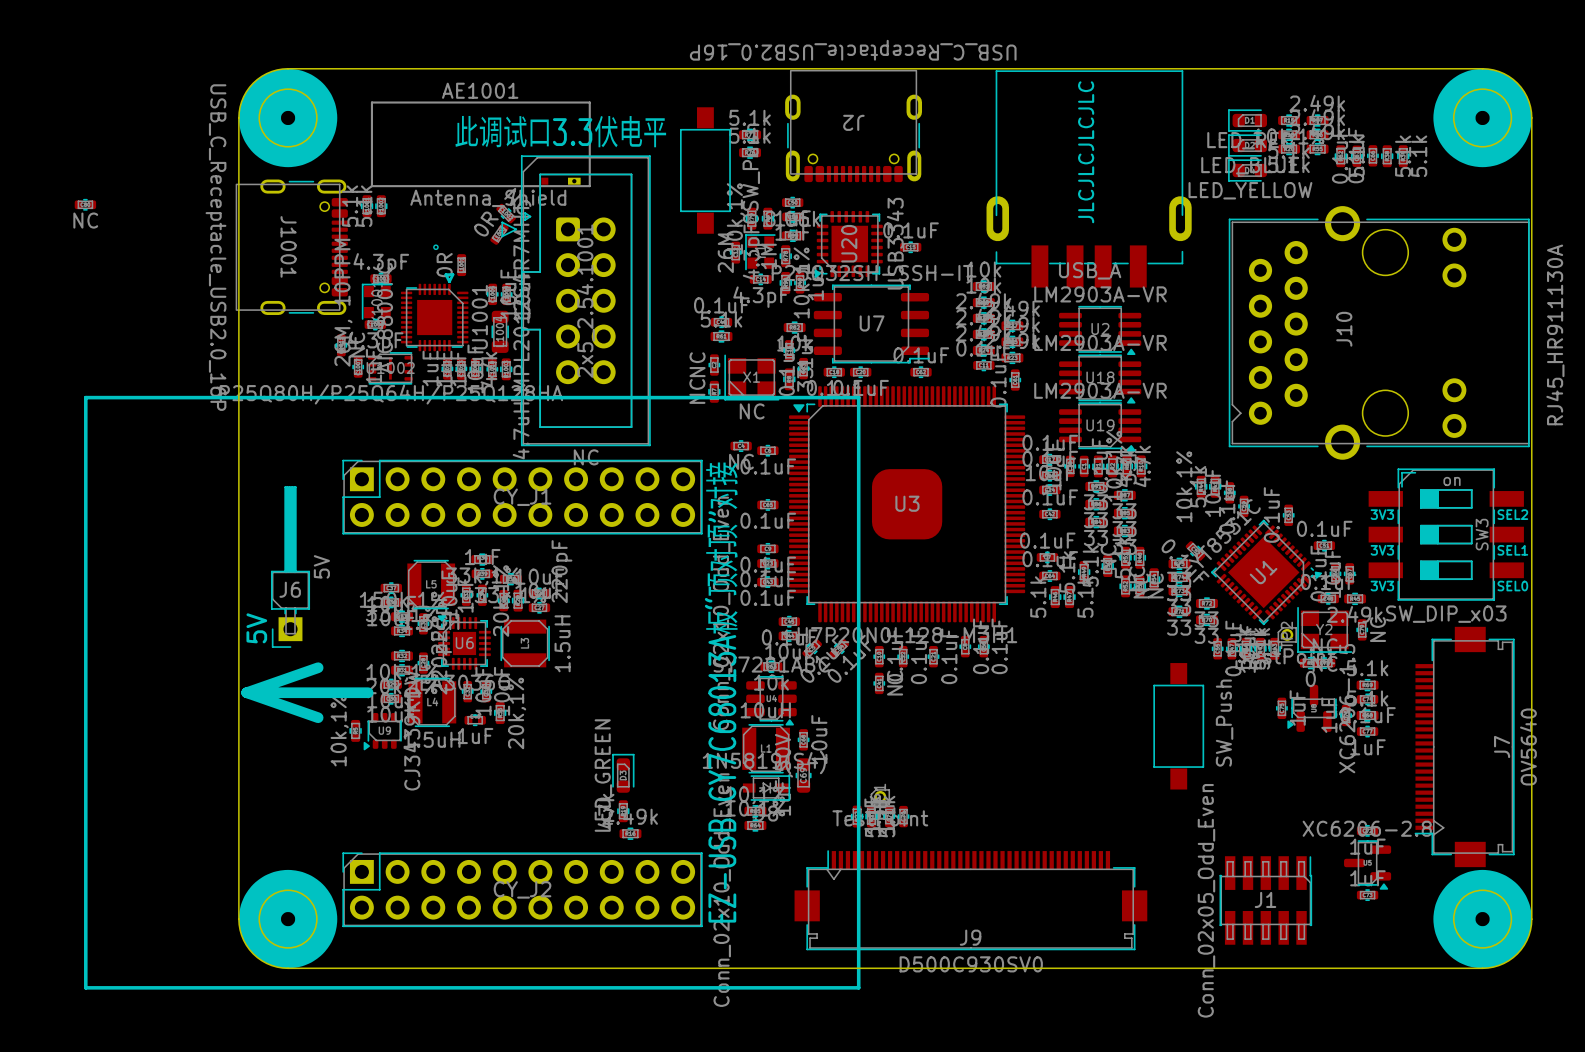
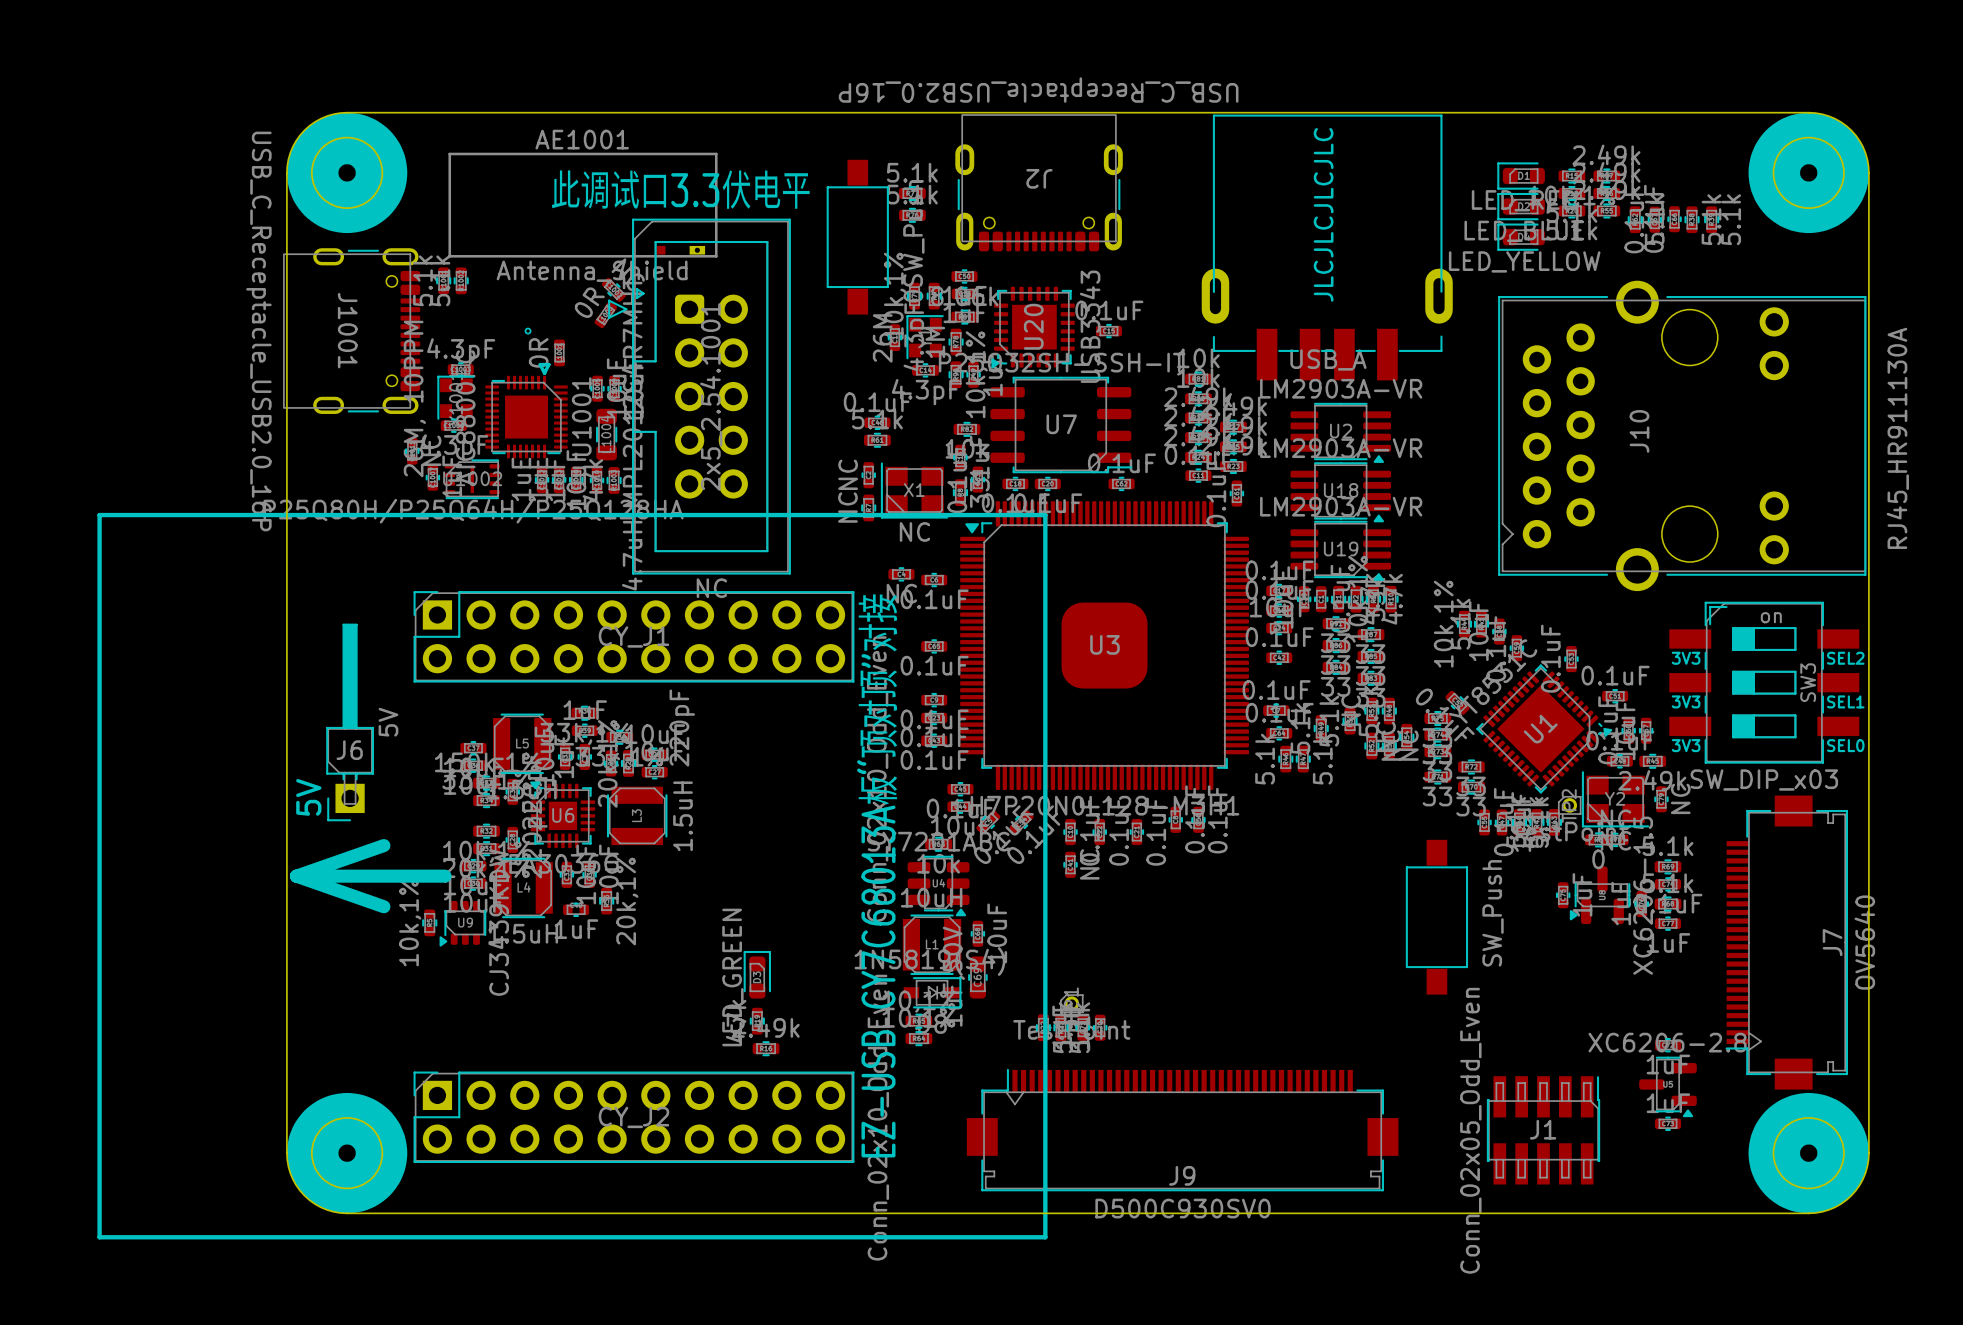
part: NC (85, 204) -> none

